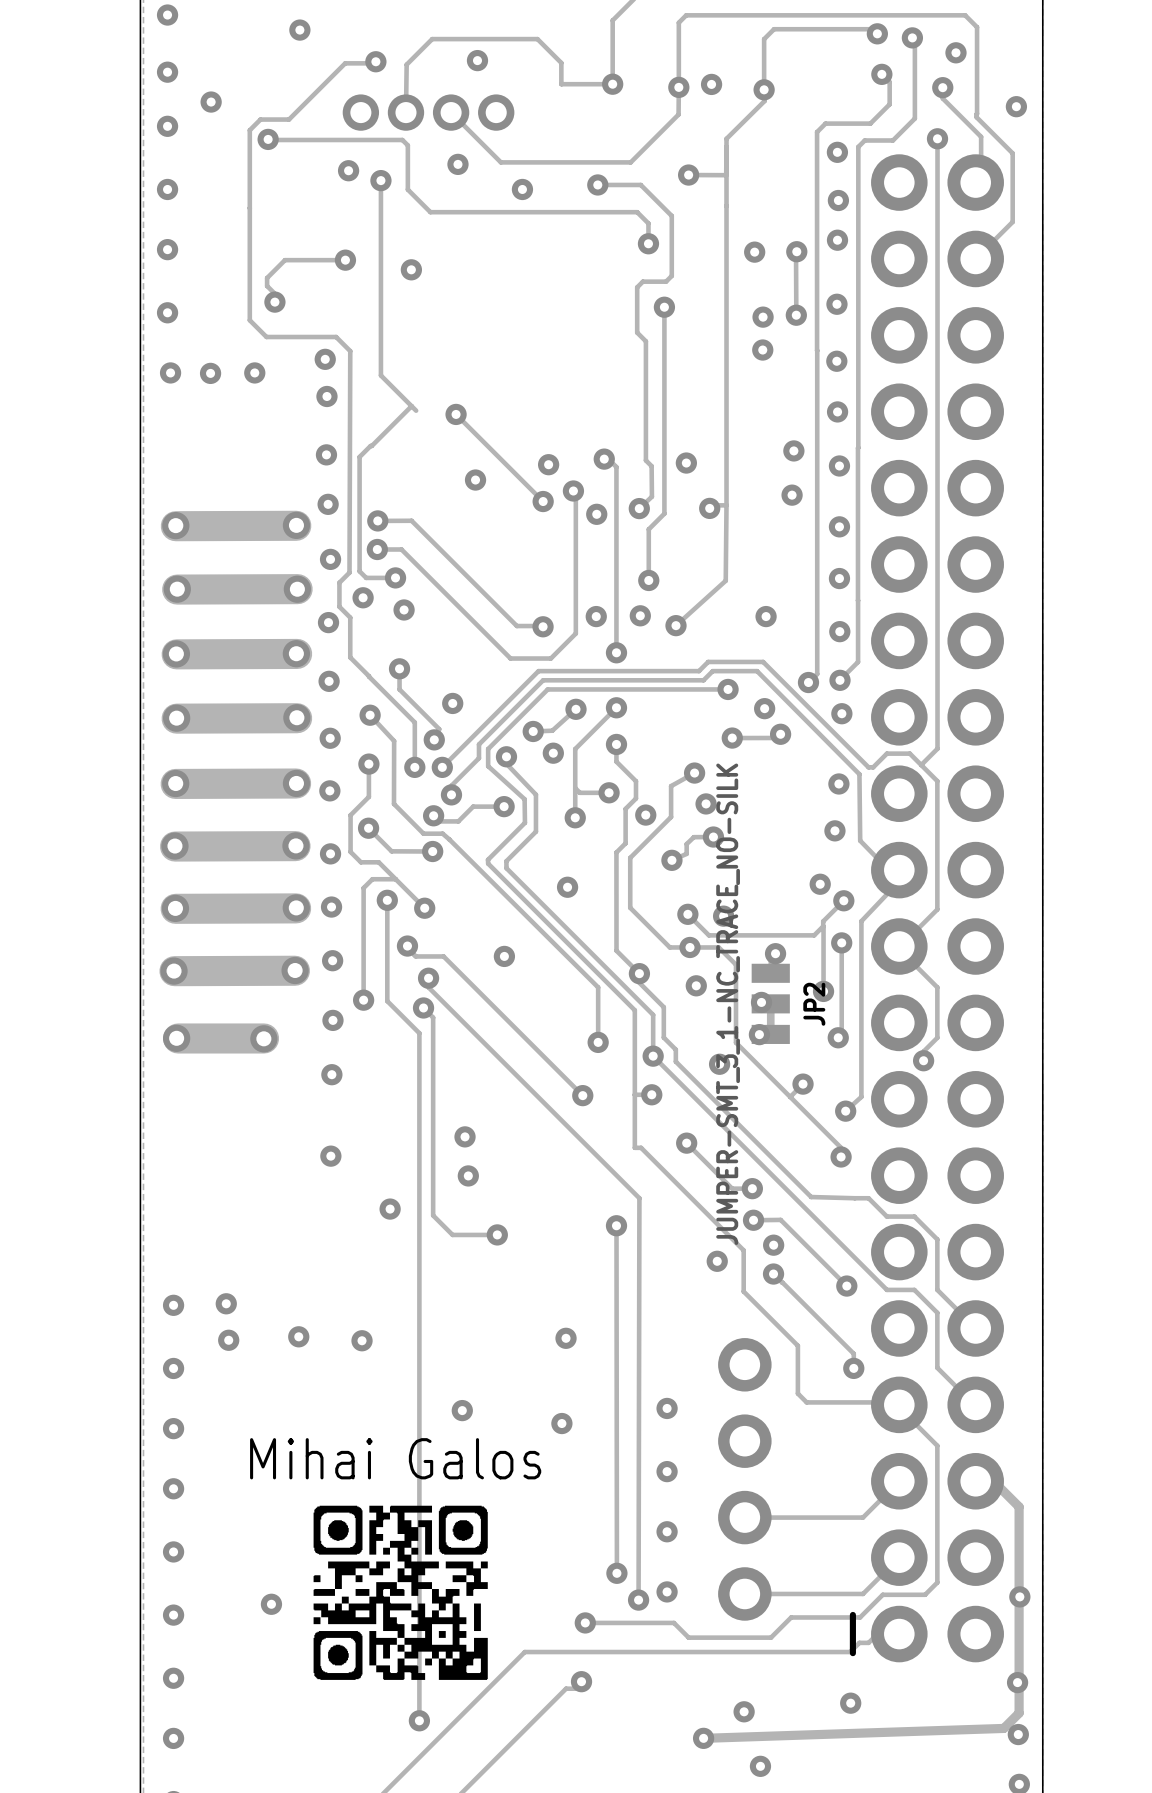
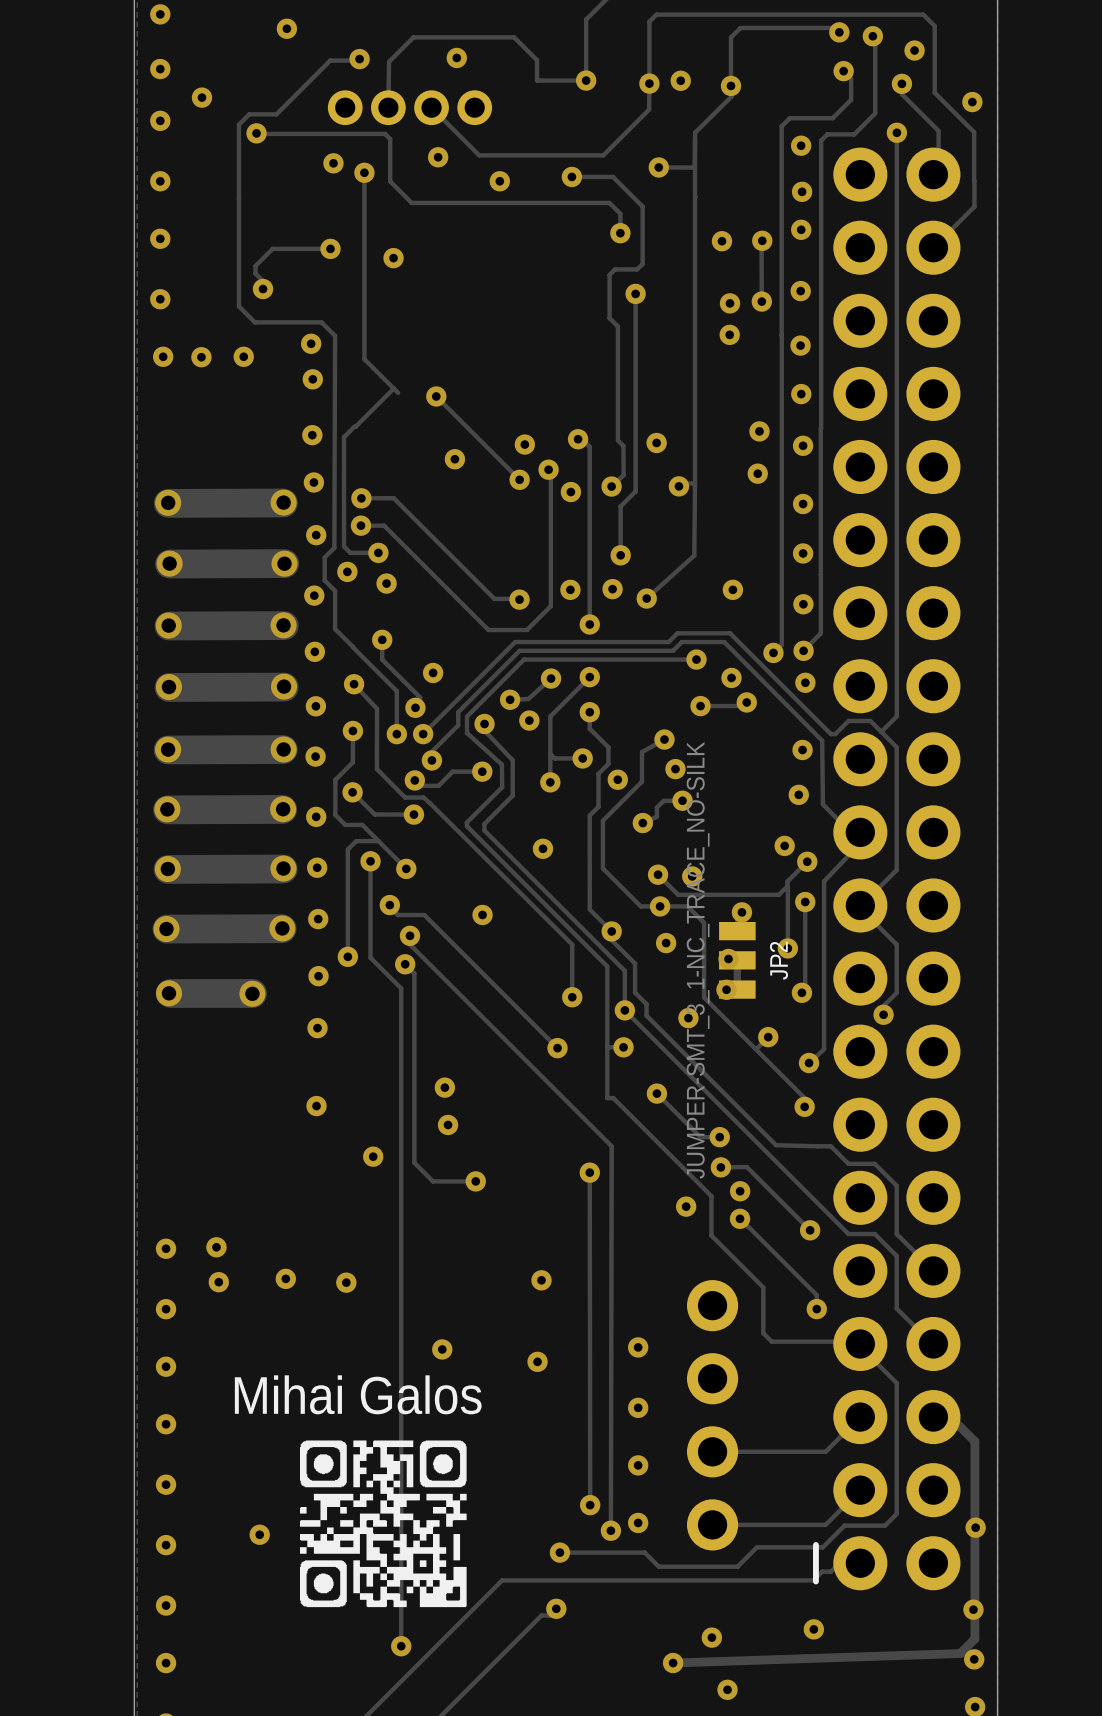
track: (977, 96) (976, 117) (1012, 153) (1012, 221) -> (934, 92) (974, 132) (974, 180)
track: none -> (974, 180) (974, 206) (968, 212)

